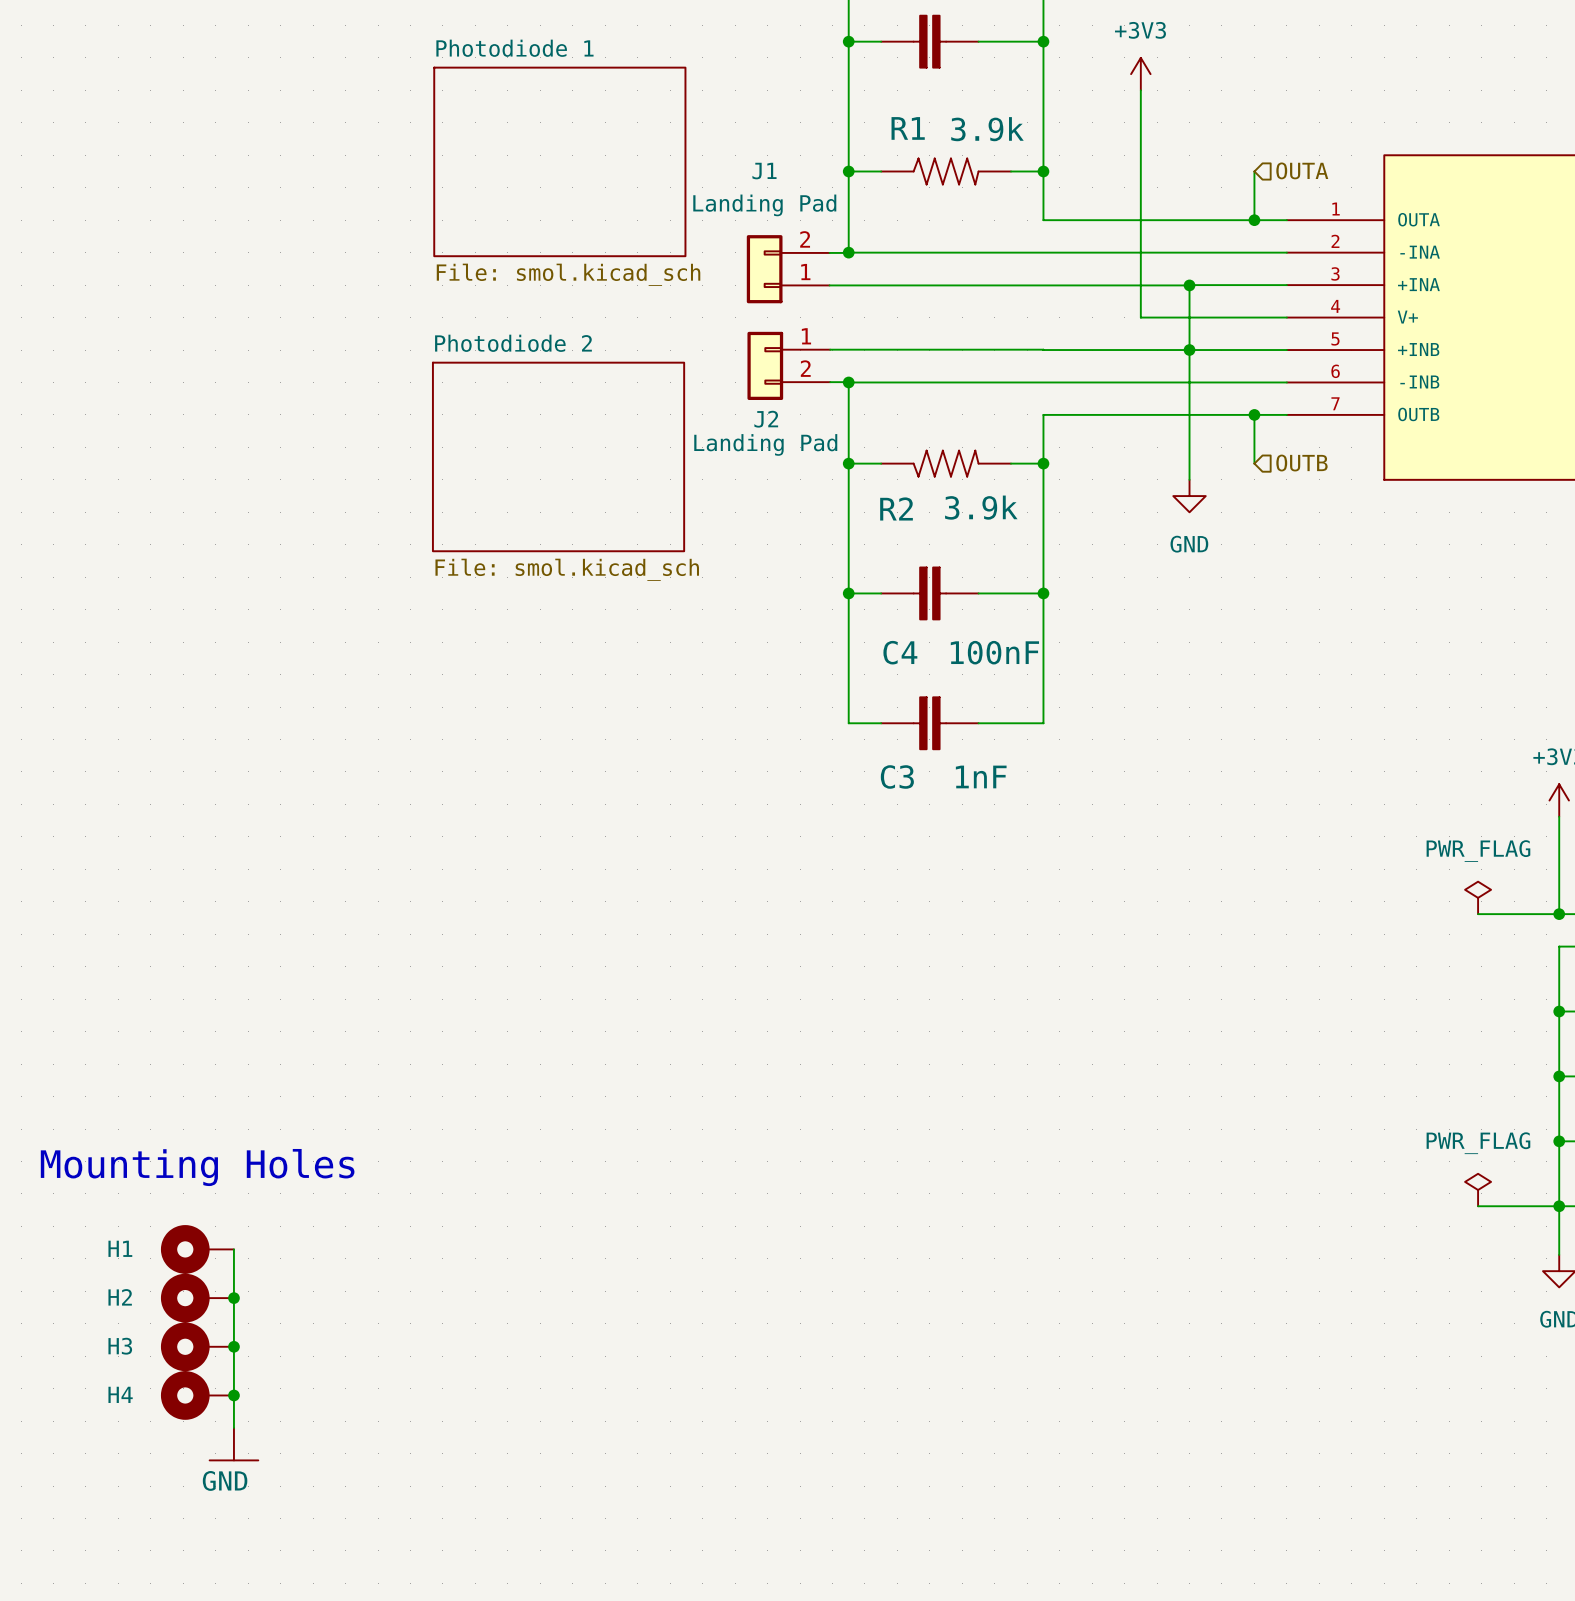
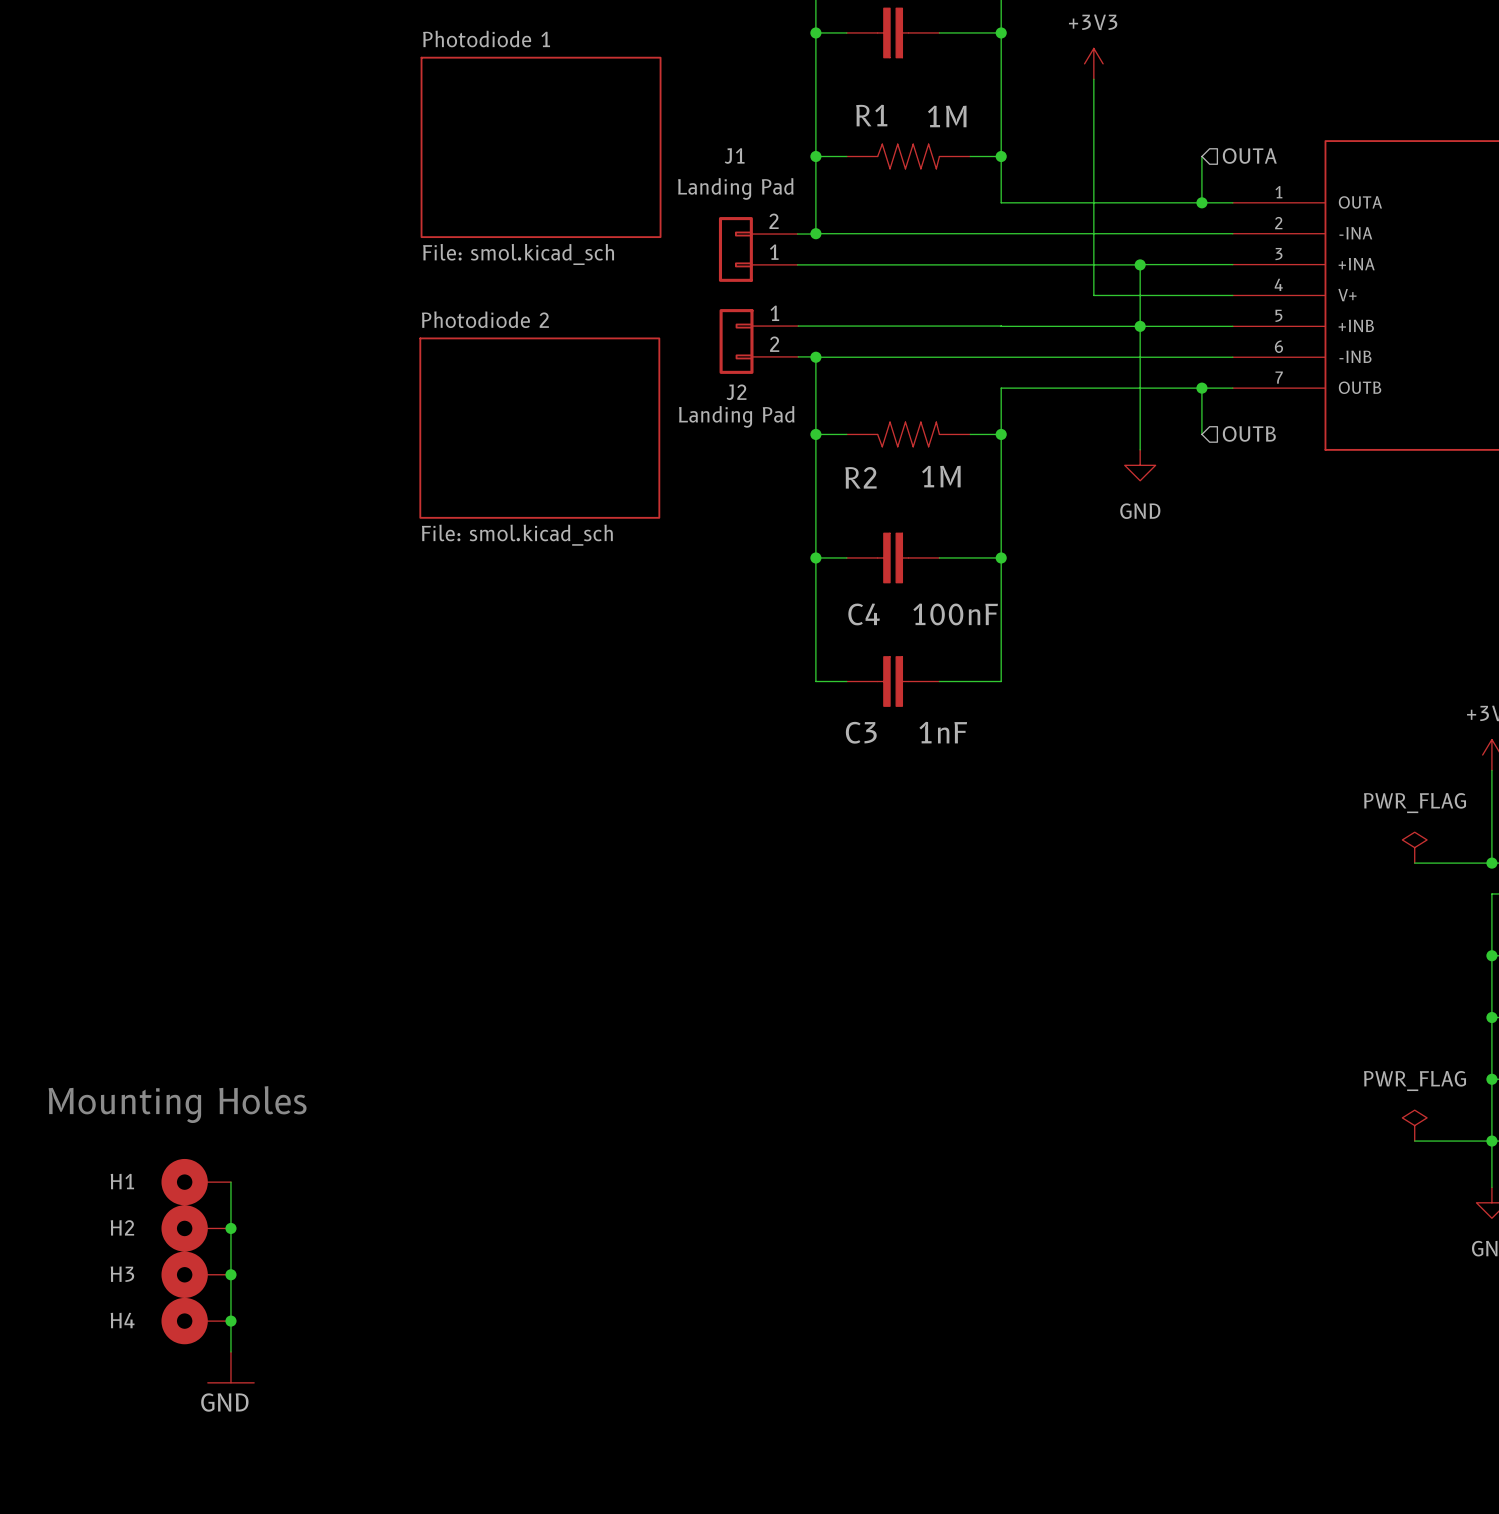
R1 value: 3.9k (987, 129) -> 1M (947, 116)
R2 value: 3.9k (981, 507) -> 1M (941, 476)

